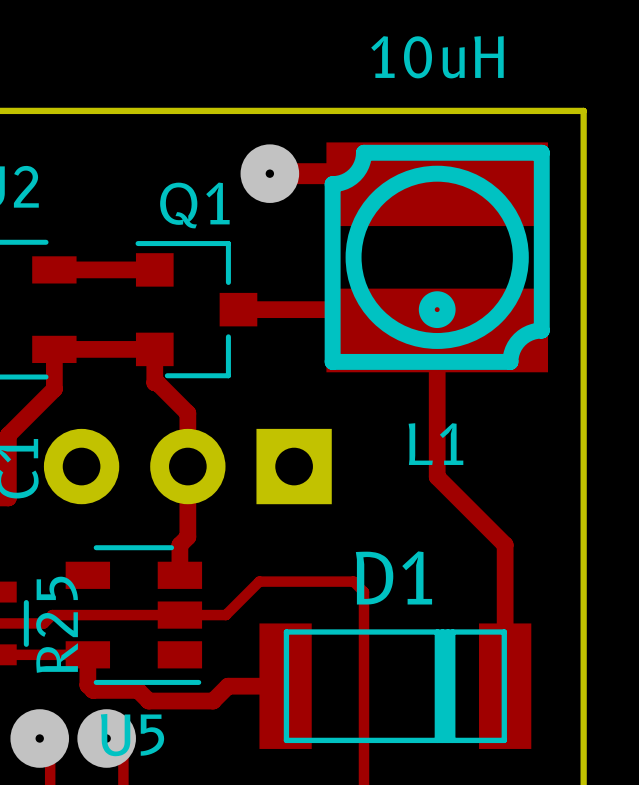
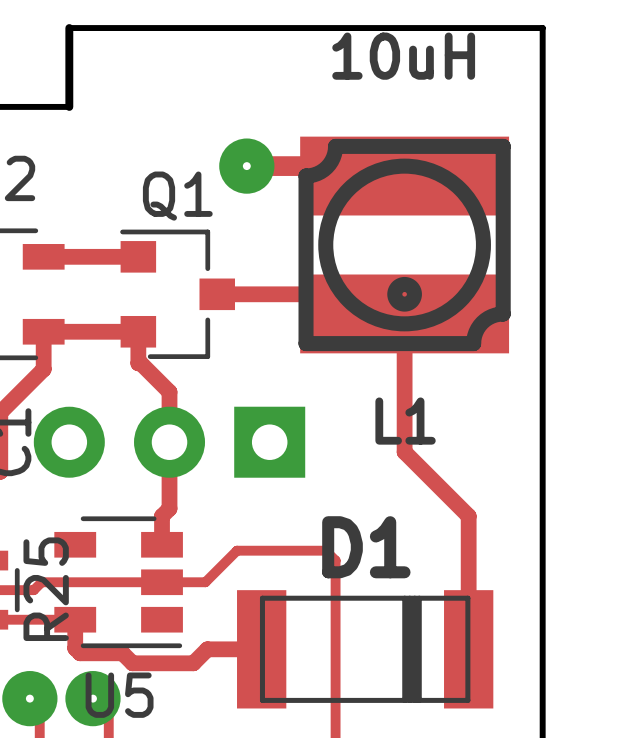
board edge: (81, 110) (583, 110) -> (69, 106) (69, 28) (542, 28) (542, 106)

